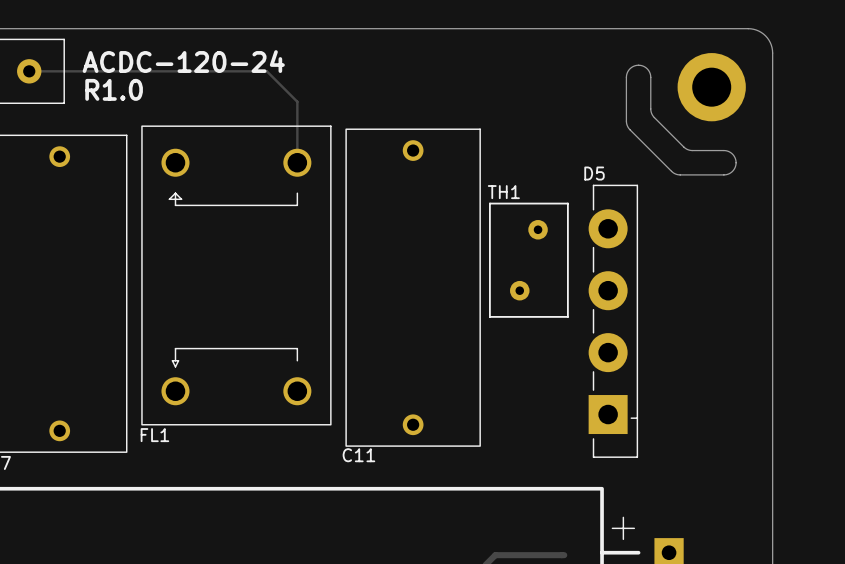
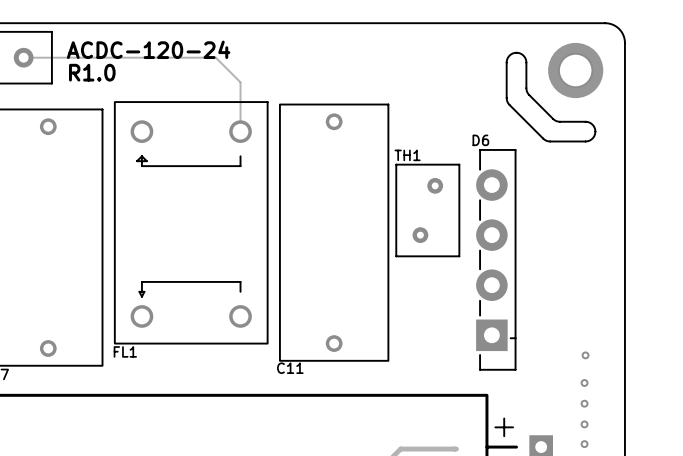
D5 name: D5 (594, 173) -> D6 (480, 140)
via: none -> (585, 355)
via: none -> (584, 383)
via: none -> (584, 403)
via: none -> (584, 424)
via: none -> (584, 444)

